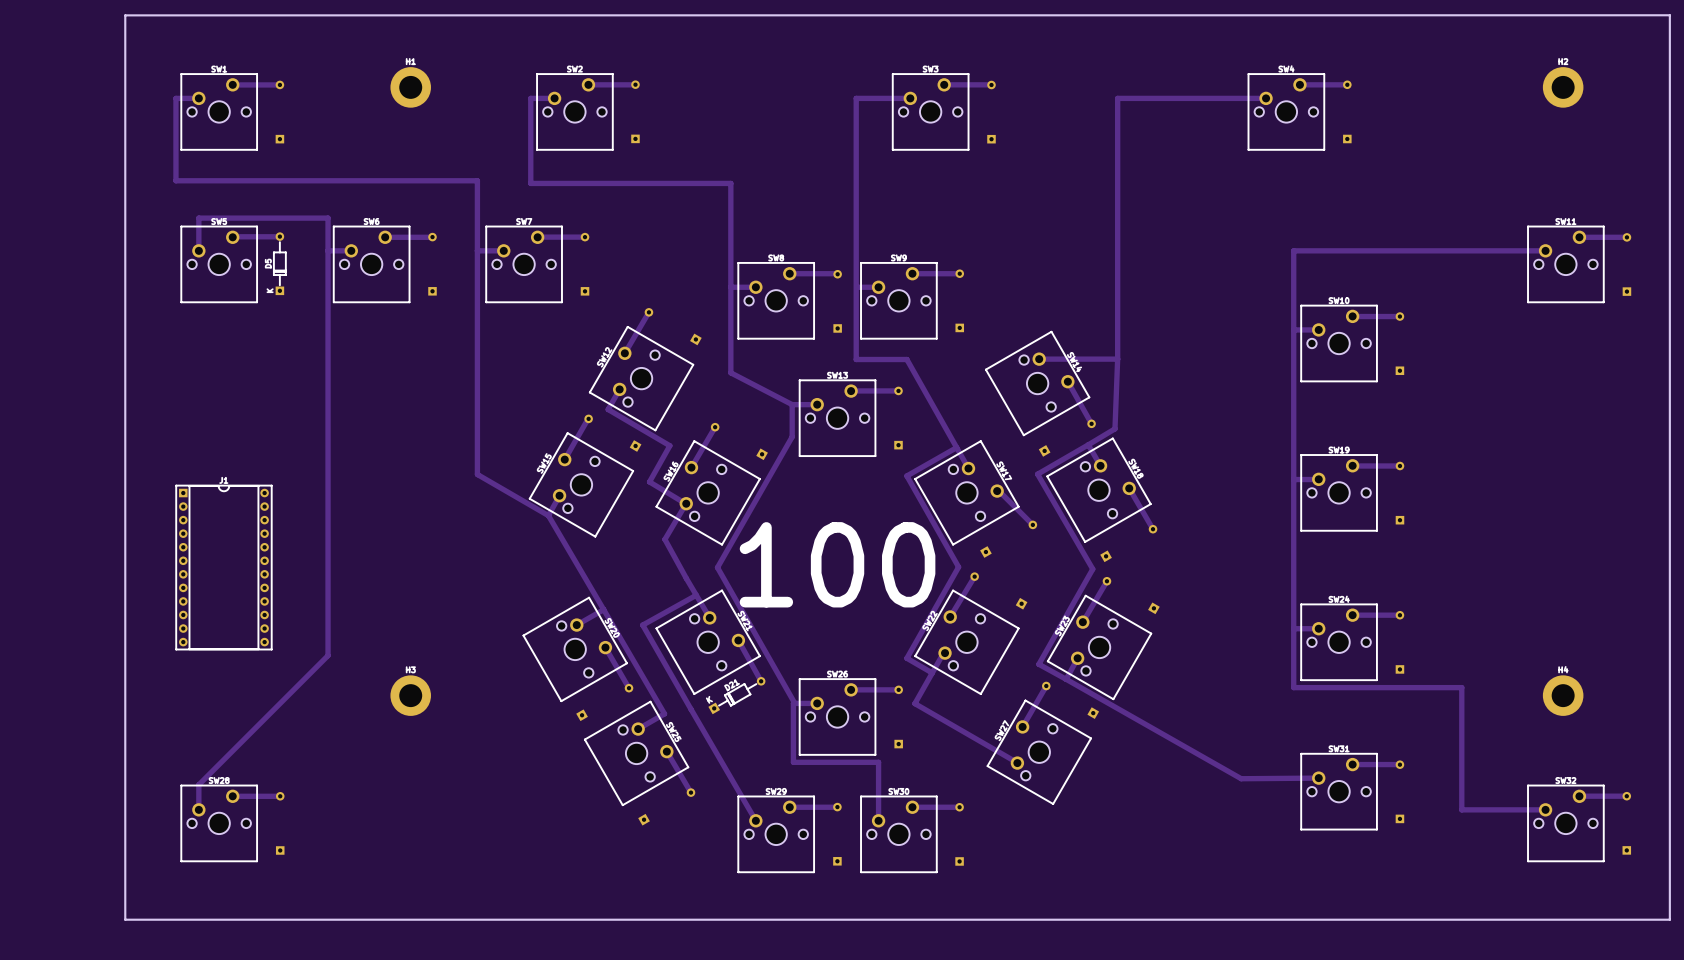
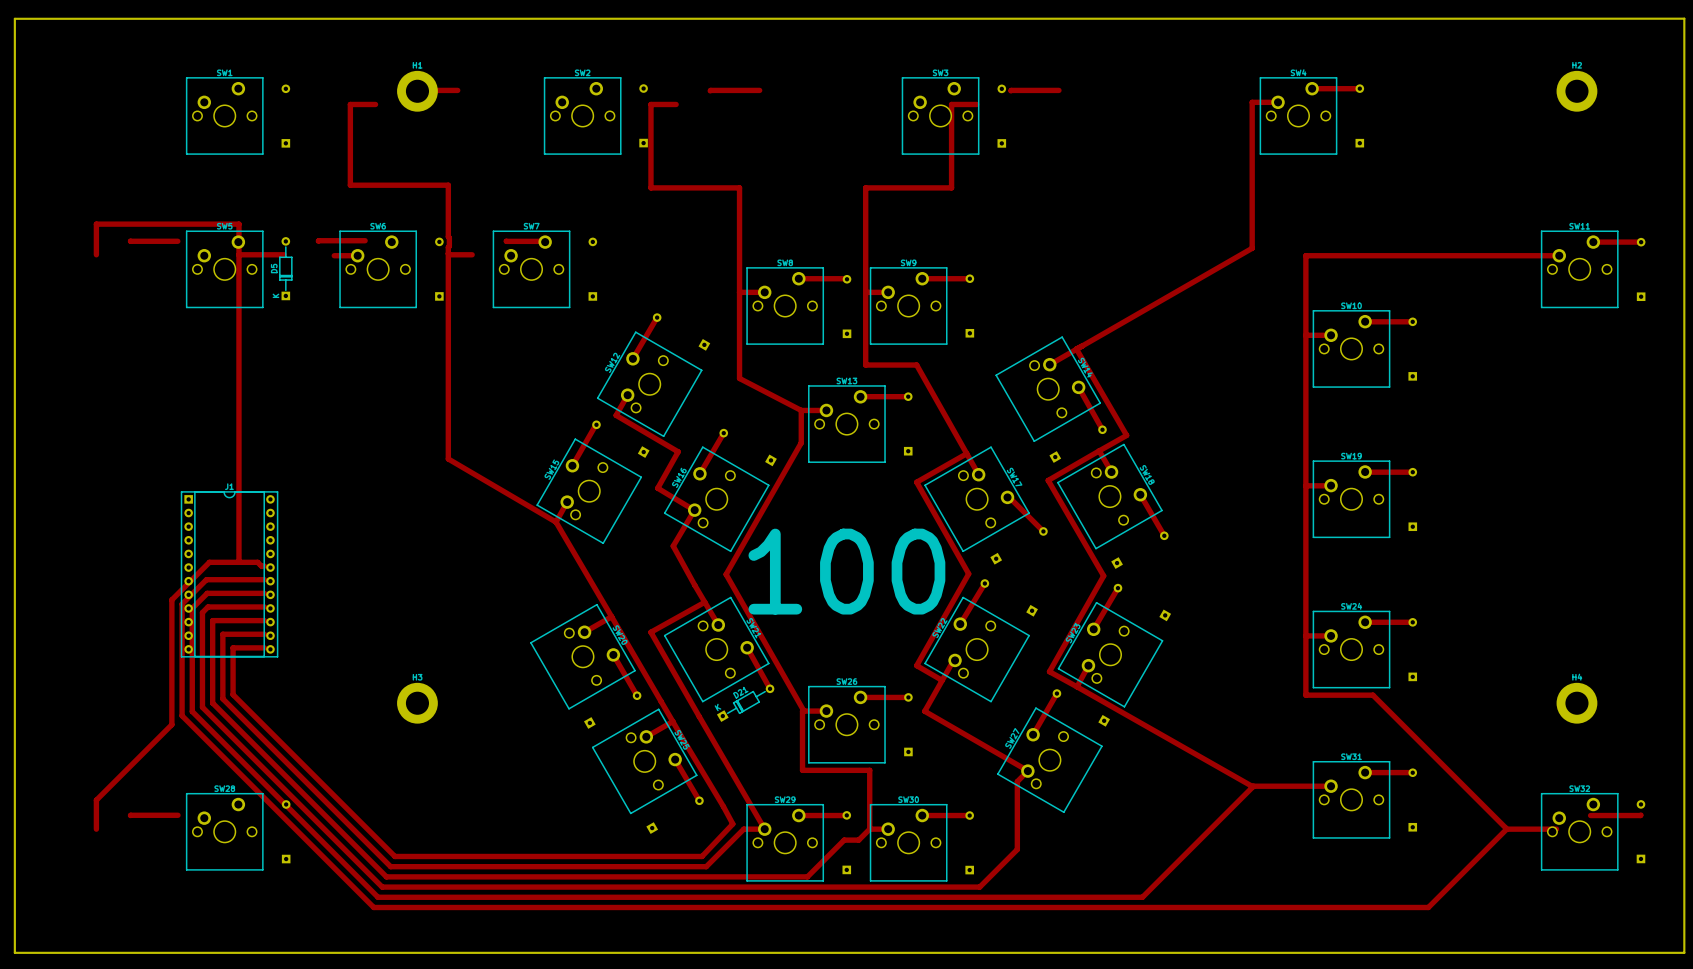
board edge: (125, 15) (125, 919) (1669, 919) -> (130, 18) (14, 18) (14, 952) (1684, 952) (1684, 928)
track: (232, 84) (279, 84) -> none
track: (588, 84) (635, 84) -> none
track: (944, 84) (991, 84) -> none
track: none -> (457, 90) (409, 90)
track: none -> (759, 90) (710, 90)
track: none -> (1058, 90) (1010, 90)
track: (198, 98) (175, 98) (175, 180) (344, 180) -> (375, 104) (350, 104) (350, 185)
track: (554, 98) (530, 98) (530, 183) (642, 183) -> (676, 104) (650, 104) (650, 187)
track: (910, 98) (856, 98) (856, 183) -> (976, 104) (951, 104) (951, 187) (865, 187)
track: (1240, 98) (1117, 98) (1117, 359) -> (1252, 102) (1252, 248) (1049, 364)
track: (441, 180) (477, 180) (477, 474) (548, 515) -> (448, 185) (448, 458) (556, 522)
track: none -> (365, 240) (318, 241)
track: none -> (130, 241) (177, 241)
track: (233, 236) (279, 236) -> none
track: none -> (506, 241) (542, 241)
track: (385, 237) (432, 237) -> none
track: (537, 237) (585, 237) -> none
track: none -> (448, 253) (472, 254)
track: none -> (96, 254) (96, 224) (238, 224) (238, 562)
track: none -> (238, 254) (284, 254)
track: (198, 250) (198, 218) (328, 218) (328, 655) (198, 784) (198, 809) -> none
track: (477, 250) (503, 250) -> none
track: (1039, 359) (1117, 359) -> none
track: (1117, 359) (1114, 428) (1088, 444) -> (1082, 345) (1076, 348) (1126, 435) (1099, 450)
track: none -> (264, 566) (257, 562) (209, 562) (171, 599) (171, 724) (96, 800) (96, 829)
track: none -> (264, 579) (206, 579) (182, 604) (182, 715) (373, 907) (1428, 907) (1506, 829)
track: none -> (264, 606) (208, 606) (202, 612) (202, 707) (382, 887) (979, 887) (1017, 849) (1017, 781) (1027, 771)
track: none -> (264, 620) (212, 620) (212, 703) (386, 876) (807, 876) (844, 840) (858, 840) (869, 829)
track: none -> (264, 634) (222, 634) (222, 698) (390, 866) (706, 866) (743, 829) (764, 829)
track: none -> (264, 647) (233, 647) (233, 694) (394, 856) (702, 856) (732, 824) (672, 721)
track: (1360, 687) (1461, 687) (1461, 809) (1545, 809) -> (1372, 695) (1505, 829) (1556, 829)
track: (860, 762) (878, 762) (878, 820) -> (869, 770) (869, 829)
track: (1318, 778) (1241, 778) -> (1331, 786) (1253, 786) (1142, 897) (378, 897) (192, 711) (192, 608) (207, 593) (264, 593)
track: (232, 796) (280, 796) -> none
track: (1579, 796) (1626, 796) -> none
track: none -> (178, 815) (130, 815)
track: none -> (1640, 815) (1590, 815)
track: none -> (869, 829) (888, 829)

